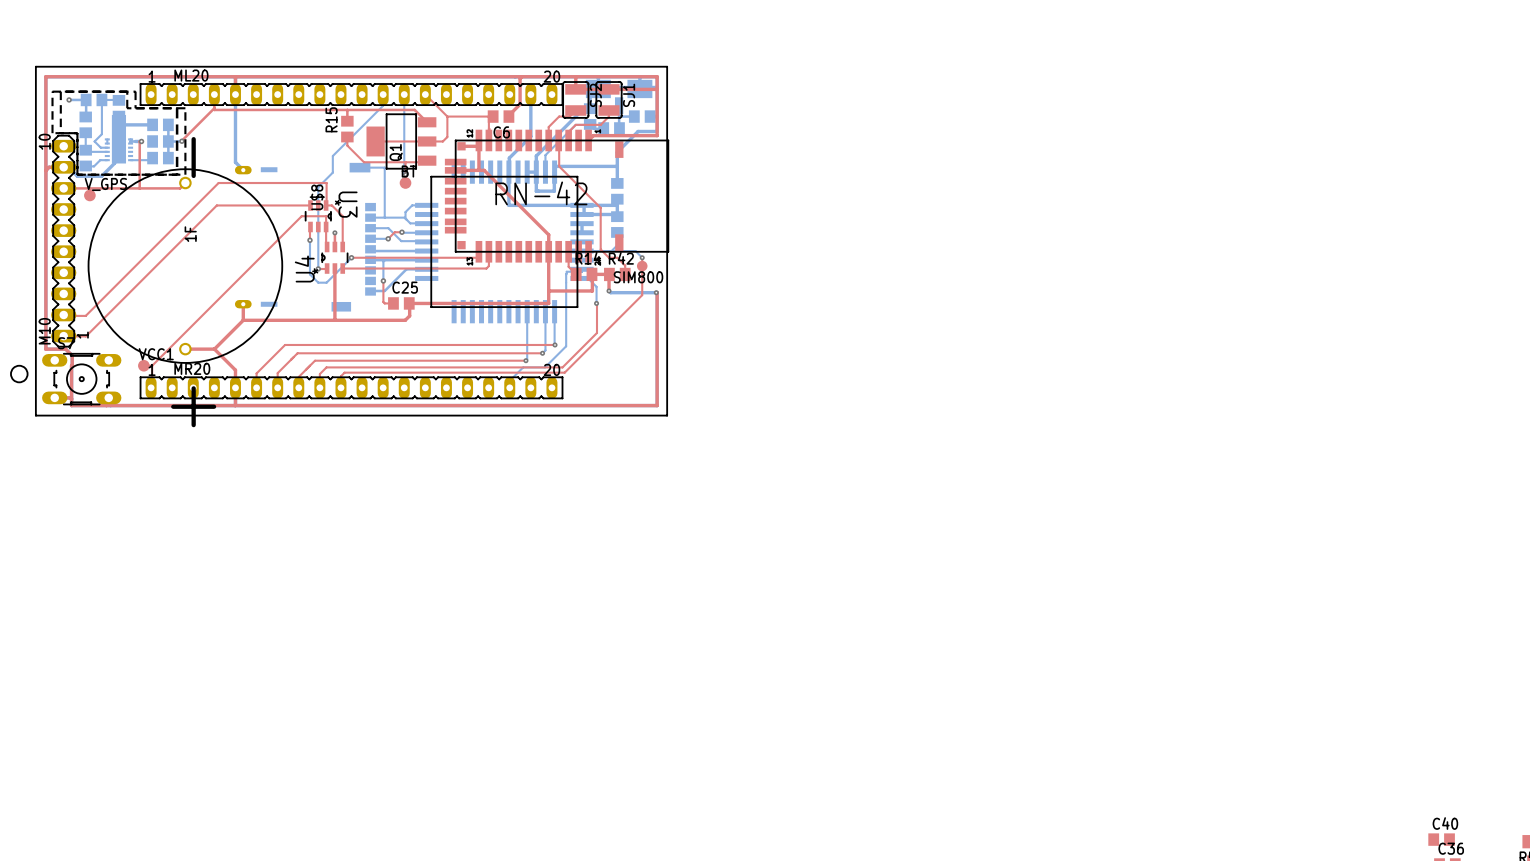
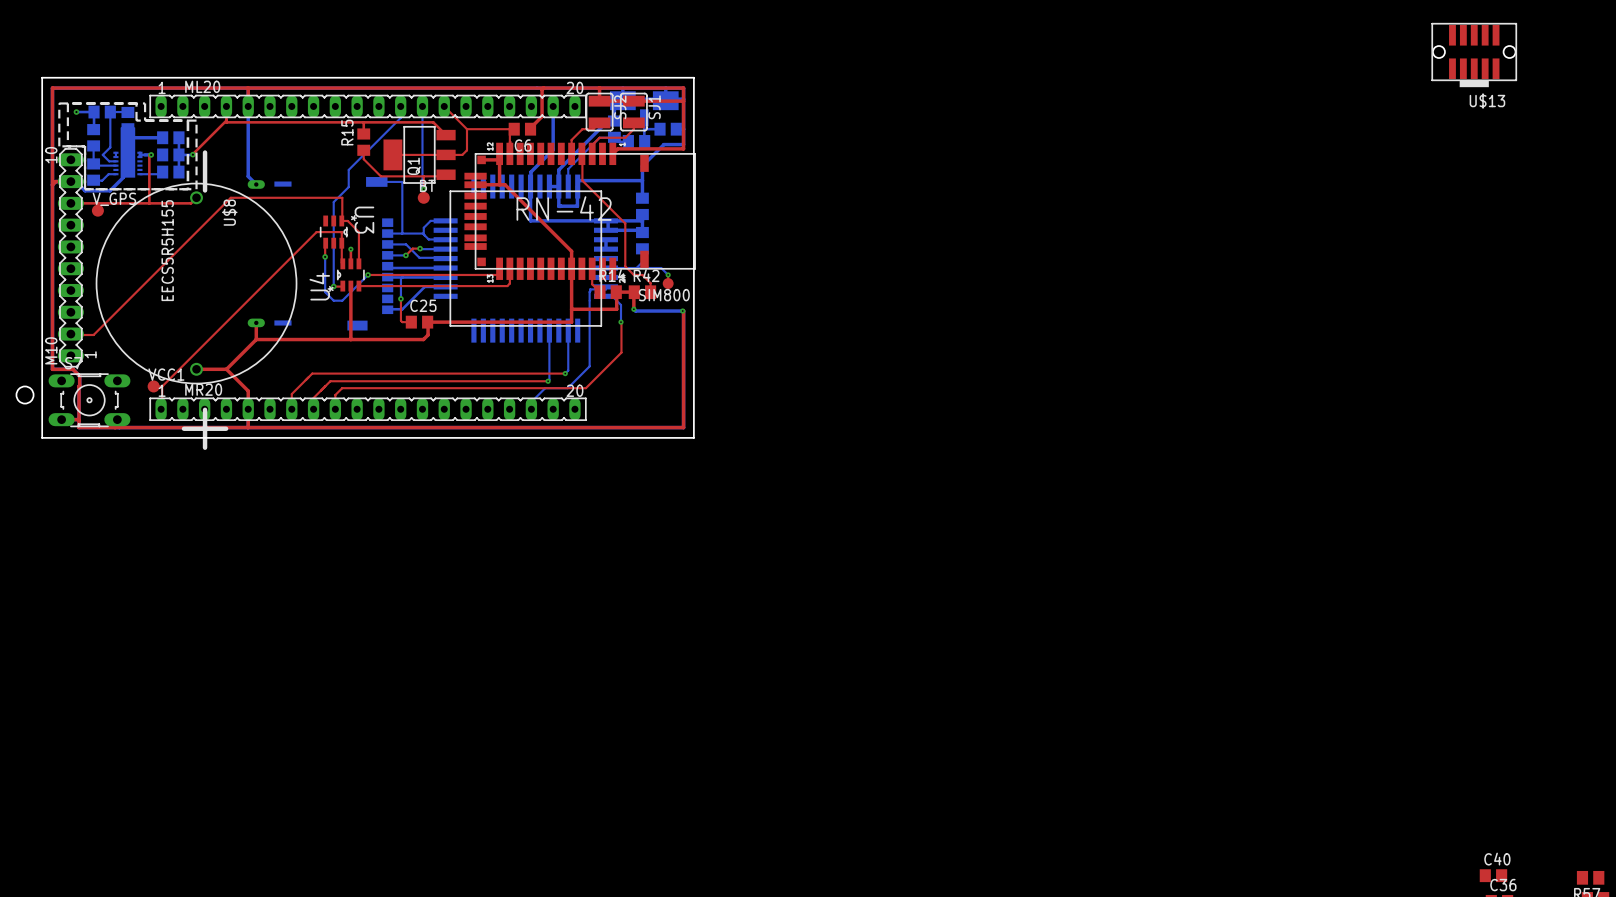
U$13: none -> (1474, 55)
U$8 name position: U$8 (317, 197) -> U$8 (229, 212)
top track: (310, 205) (216, 205) (85, 336) (63, 336) -> none
U$8 value: 1F (190, 234) -> EECS5R5H155 (167, 250)
top track: (642, 266) (642, 295) (564, 372) (344, 372) (340, 376) (340, 387) -> none
bottom track: (554, 311) (555, 344) -> none
top track: (555, 344) (285, 344) (256, 373) (256, 387) -> none
via: (555, 344) -> none

